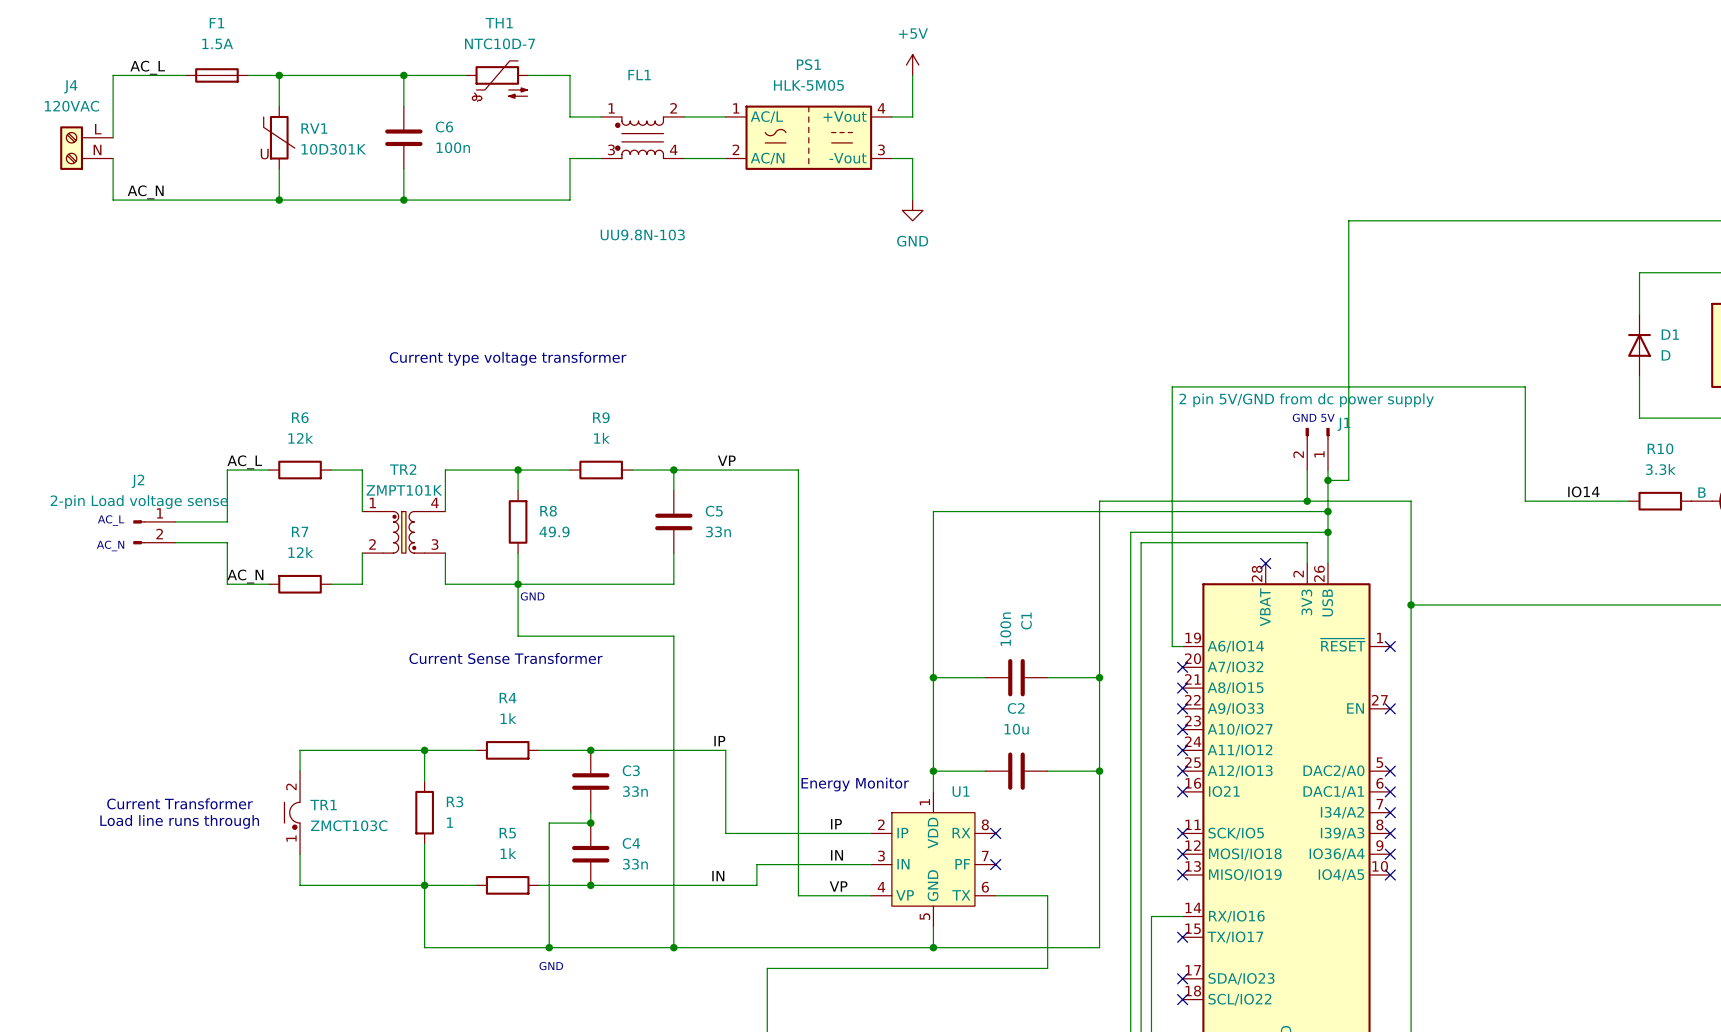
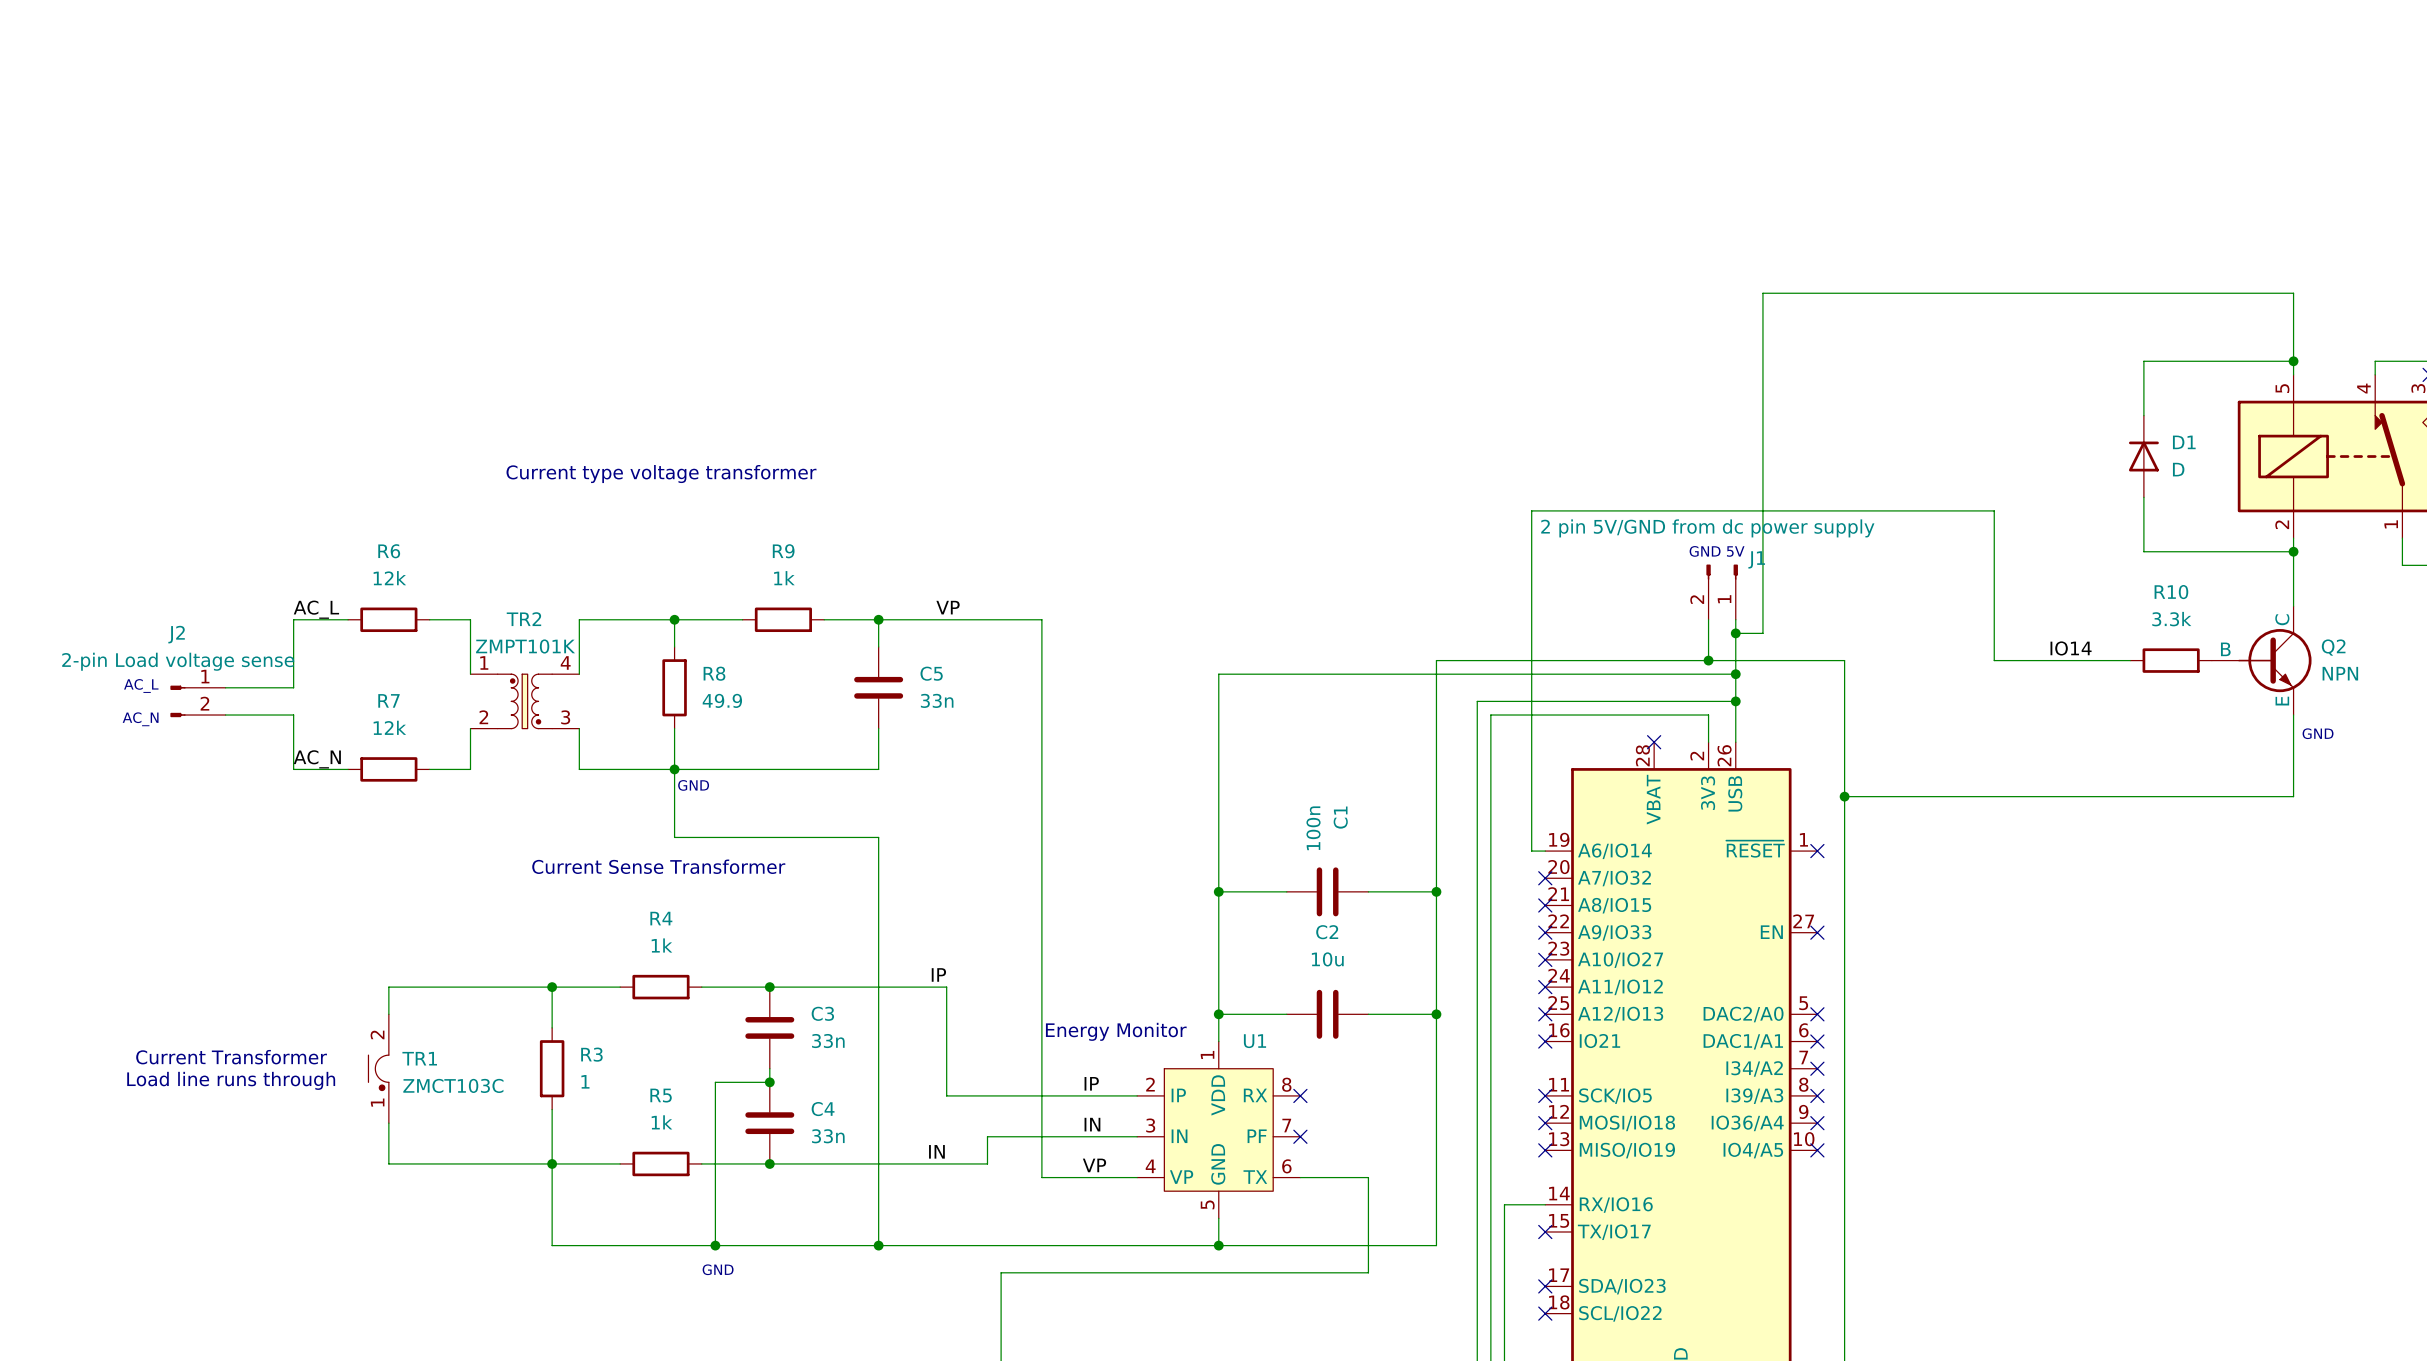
power symbol: +5V (912, 65) -> none
label: AC_L (147, 67) -> none
wire: (185, 75) (113, 75) (113, 137) -> none
F1: 1.5A (216, 75) -> none
wire: (248, 75) (466, 75) -> none
wire: (279, 75) (279, 106) -> none
junction: (279, 75) -> none
wire: (403, 75) (403, 106) -> none
junction: (403, 75) -> none
wire: (528, 75) (570, 75) (570, 116) (601, 116) -> none
wire: (912, 75) (912, 116) (891, 116) -> none
TH1: NTC10D-7 (497, 81) -> none
wire: (684, 116) (725, 116) -> none
RV1: 10D301K (279, 137) -> none
C6: 100n (403, 137) -> none
FL1: UU9.8N-103 (642, 137) -> none
PS1: HLK-5M05 (808, 137) -> none
J4: 120VAC (86, 148) -> none
wire: (113, 158) (113, 200) (570, 200) (570, 158) (601, 158) -> none
wire: (684, 158) (725, 158) -> none
wire: (891, 158) (912, 158) (912, 200) -> none
wire: (279, 168) (279, 200) -> none
wire: (403, 168) (403, 200) -> none
label: AC_N (145, 192) -> none
junction: (279, 200) -> none
junction: (403, 200) -> none
power symbol: GND (912, 210) -> none

